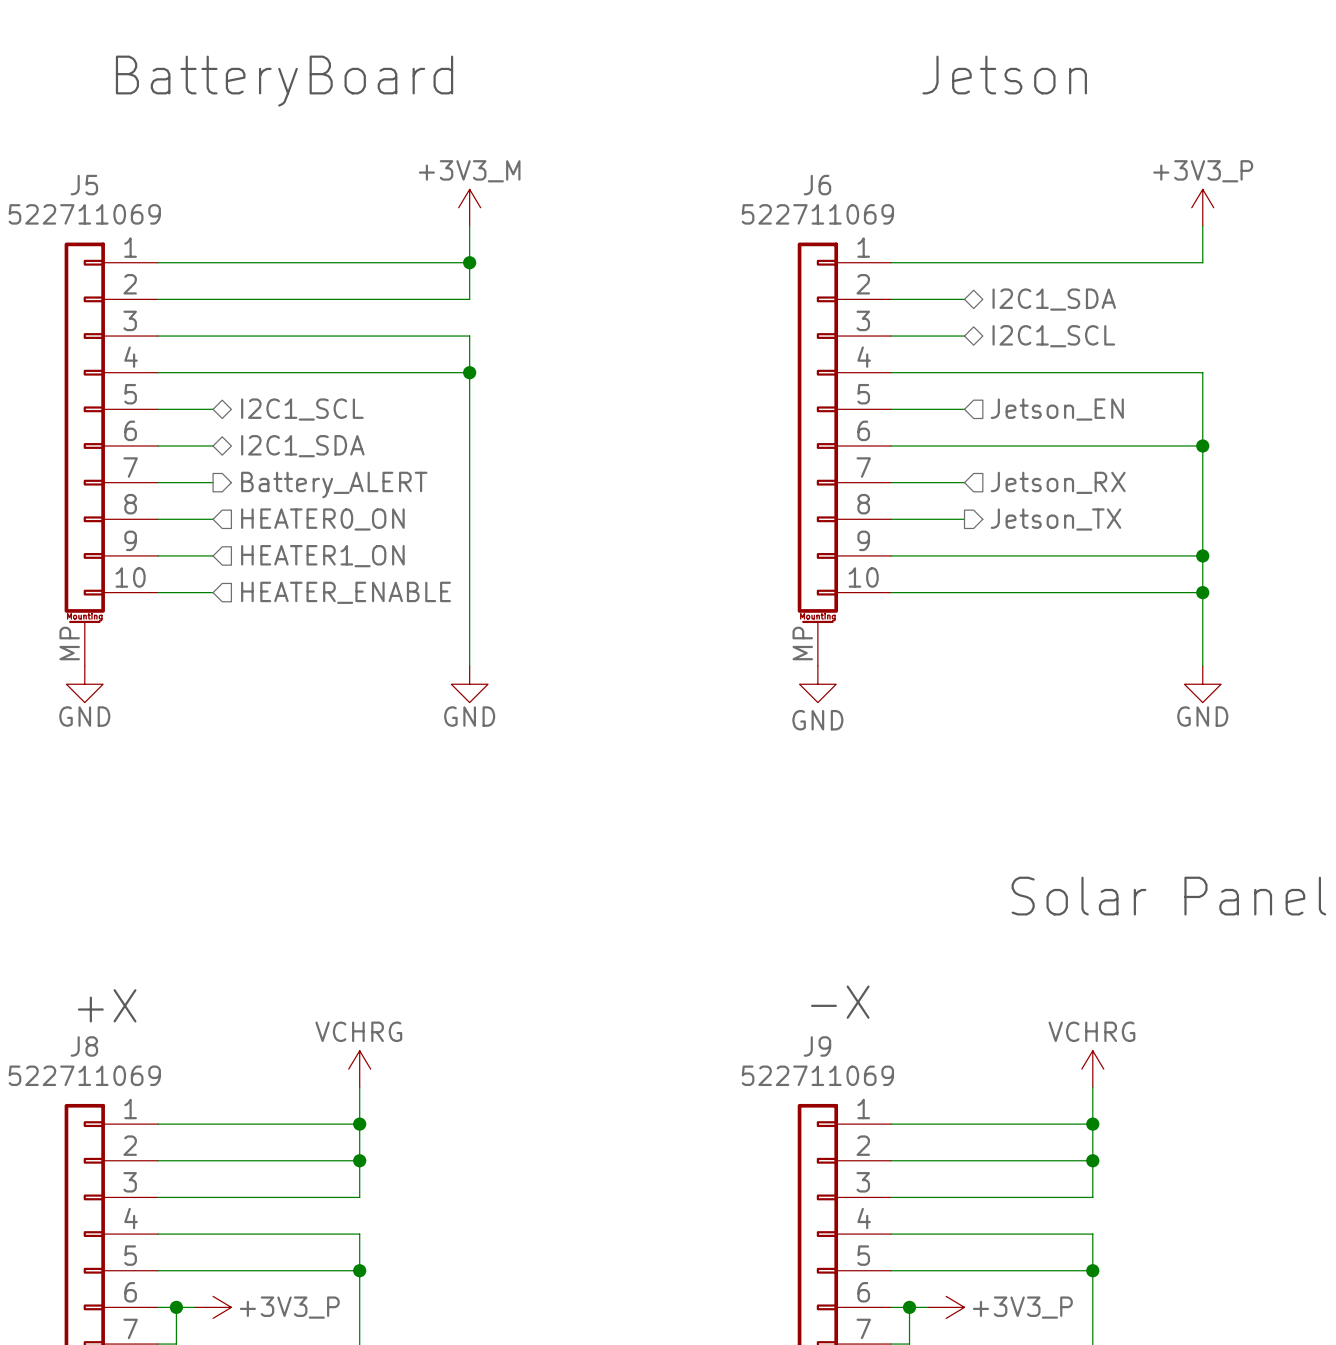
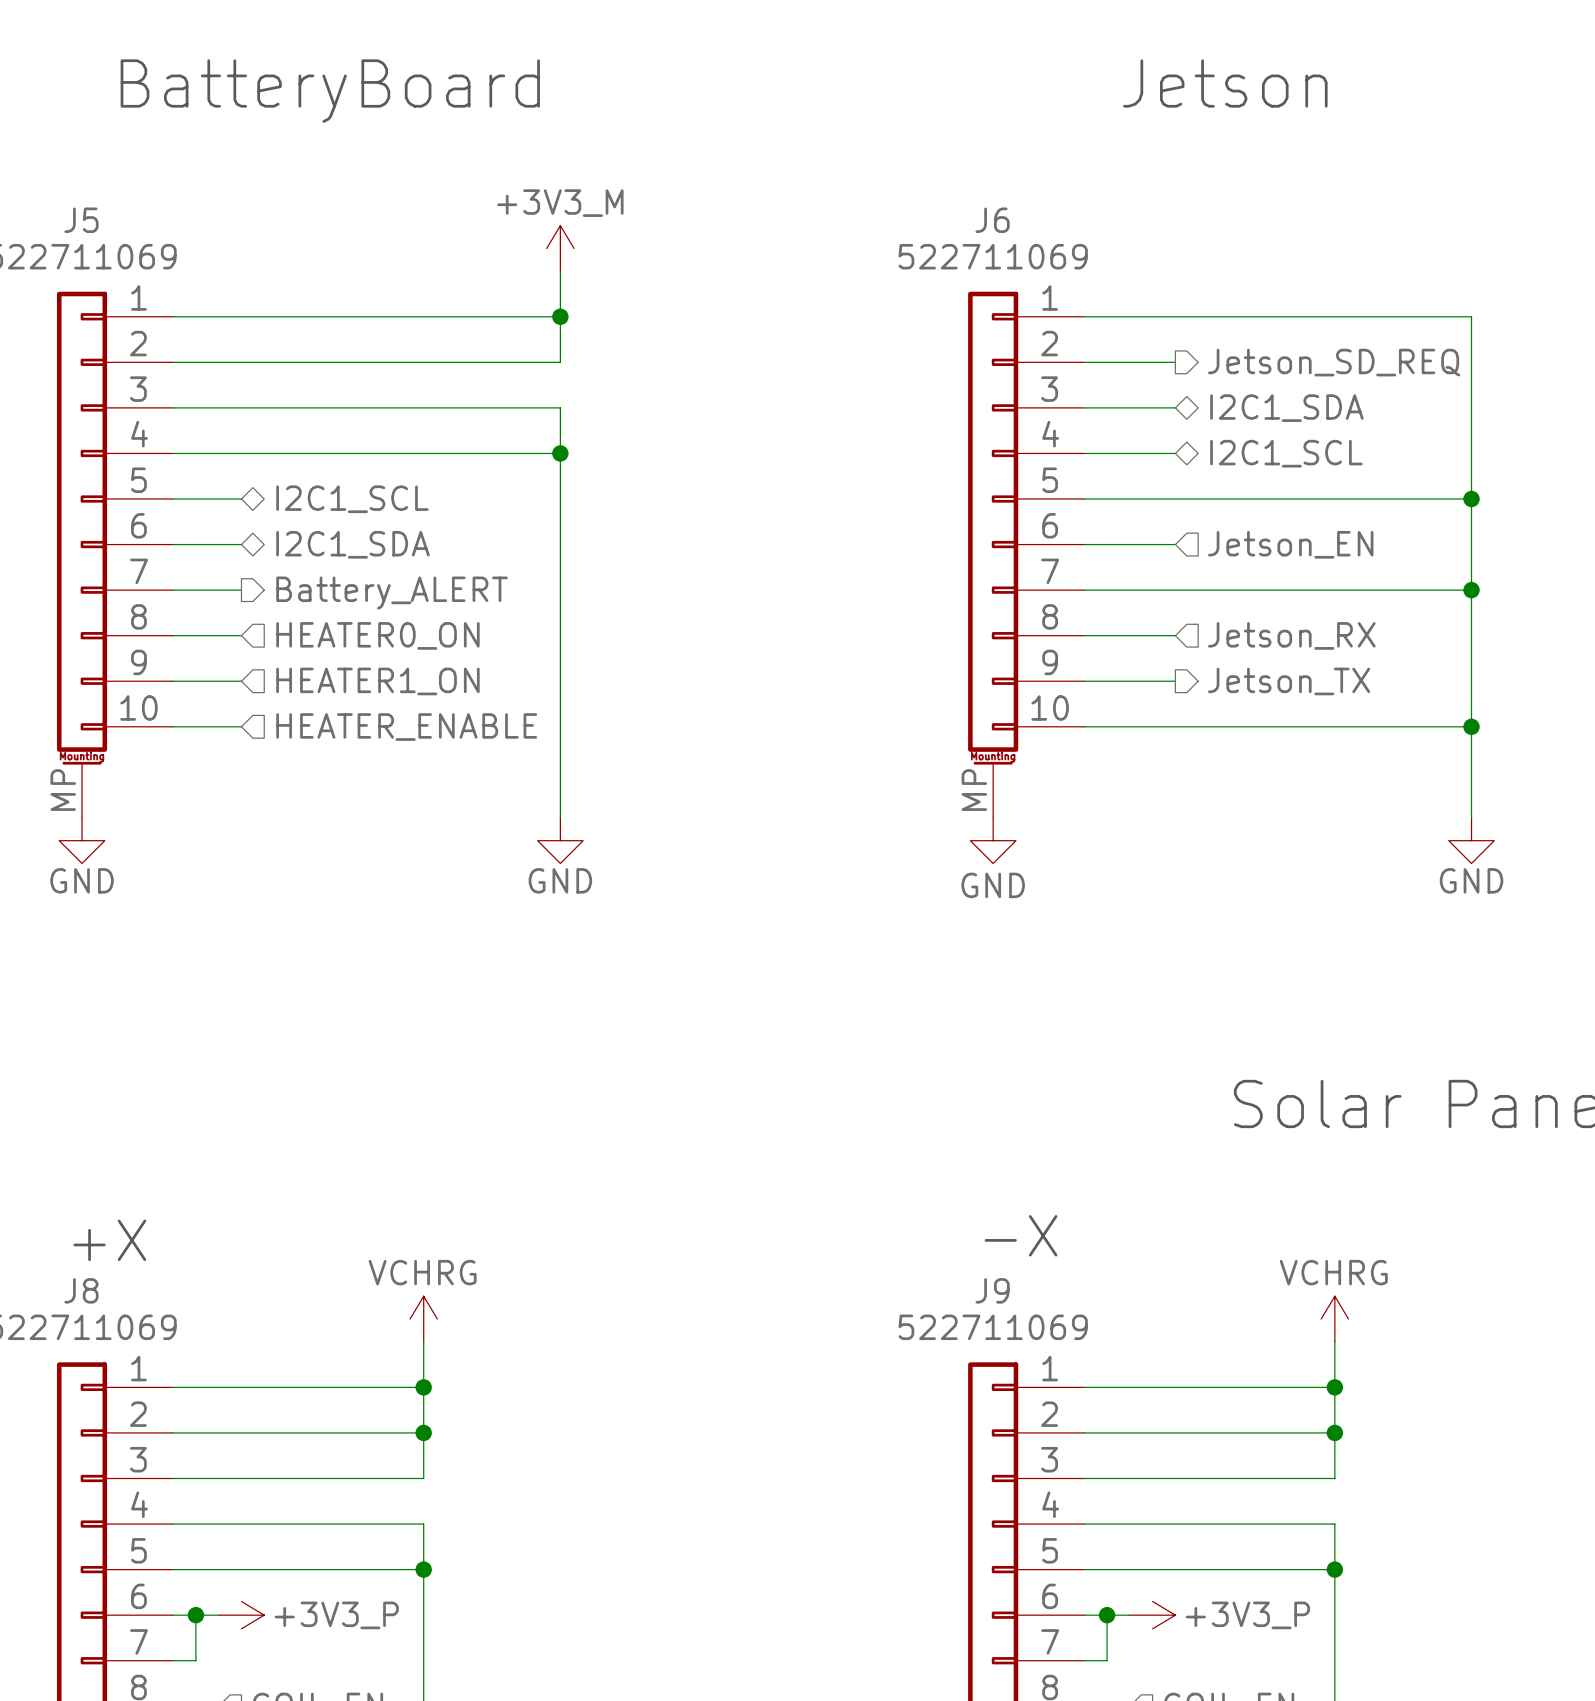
power symbol: +3V3_P (1202, 207) -> none
wire: (1202, 226) (1202, 262) -> (1471, 453) (1471, 316)
hierarchical label shape: bidirectional (1054, 299) -> output (1334, 362)
hierarchical label: I2C1_SDA (1054, 299) -> Jetson_SD_REQ (1334, 362)
hierarchical label: I2C1_SCL (1053, 336) -> I2C1_SDA (1286, 408)
wire: (964, 372) (1202, 372) -> (1175, 499) (1471, 499)
hierarchical label: none -> I2C1_SCL (1286, 453)
hierarchical label position: Jetson_EN (1057, 409) -> Jetson_EN (1290, 544)
junction: none -> (1471, 499)
wire: (964, 445) (1202, 445) -> (1175, 590) (1471, 590)
junction: (1202, 445) -> none
hierarchical label: Jetson_RX (1058, 482) -> none
junction: none -> (1471, 590)
hierarchical label shape: output (1055, 519) -> input (1291, 635)
hierarchical label: Jetson_TX (1055, 519) -> Jetson_RX (1291, 635)
wire: (964, 555) (1202, 555) -> none
junction: (1202, 555) -> none
hierarchical label: none -> Jetson_TX (1289, 681)

